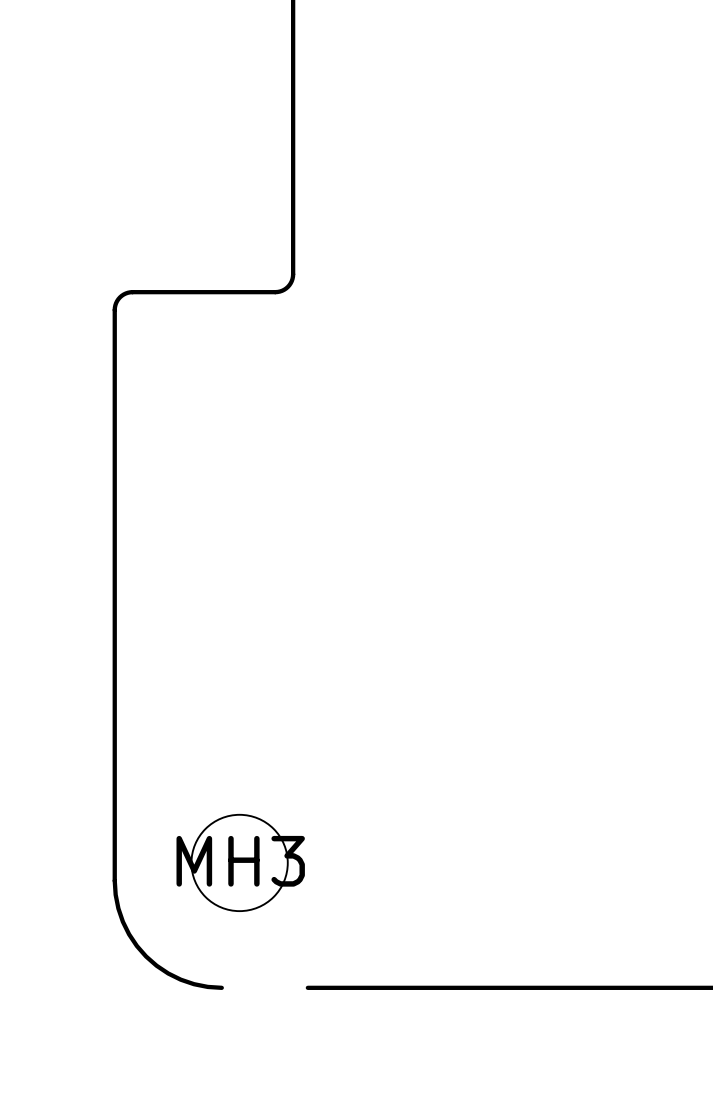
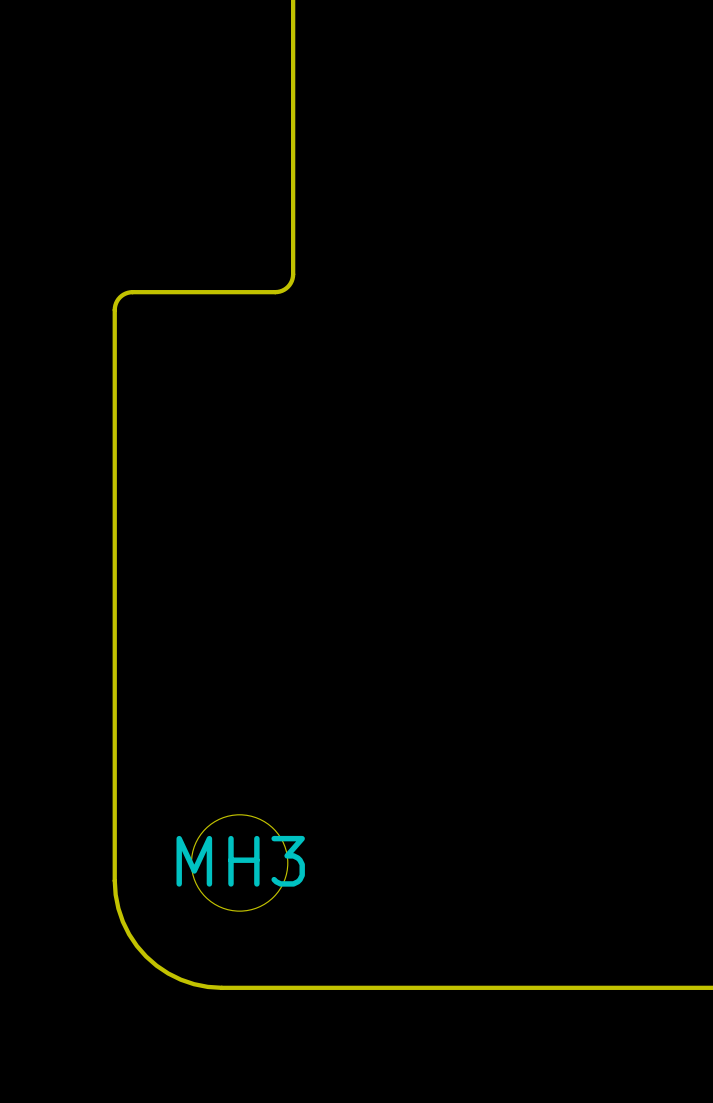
board edge: none -> (221, 987) (307, 987)

